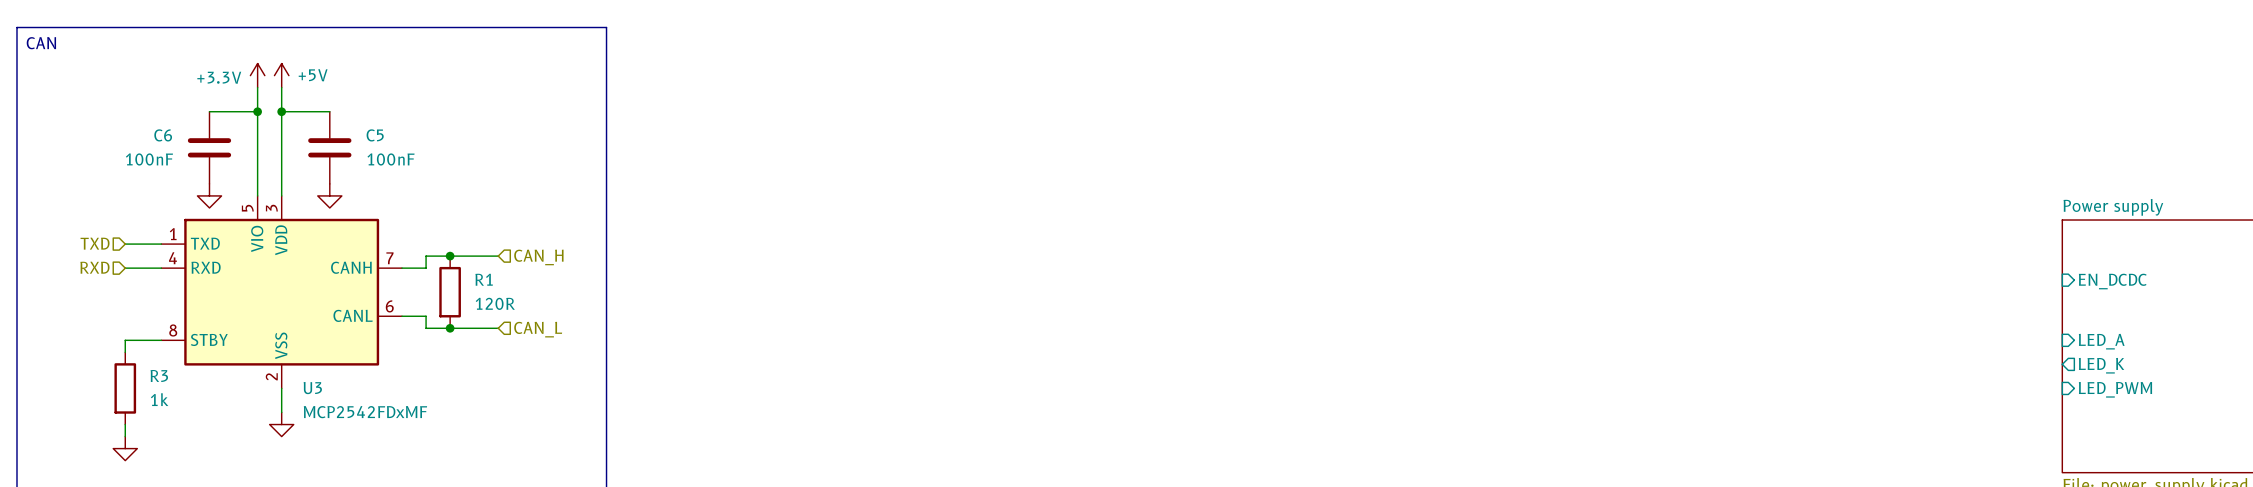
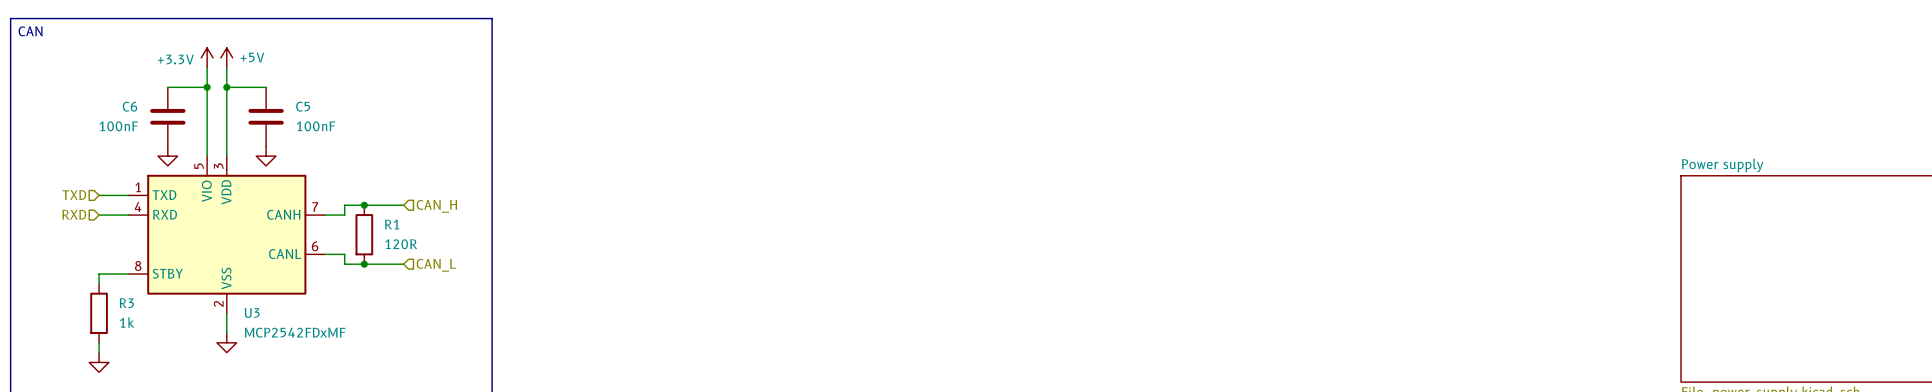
sheet pin: EN_DCDC (2112, 281) -> none
sheet pin: LED_A (2101, 341) -> none
sheet pin: LED_K (2101, 365) -> none
sheet pin: LED_PWM (2115, 389) -> none

